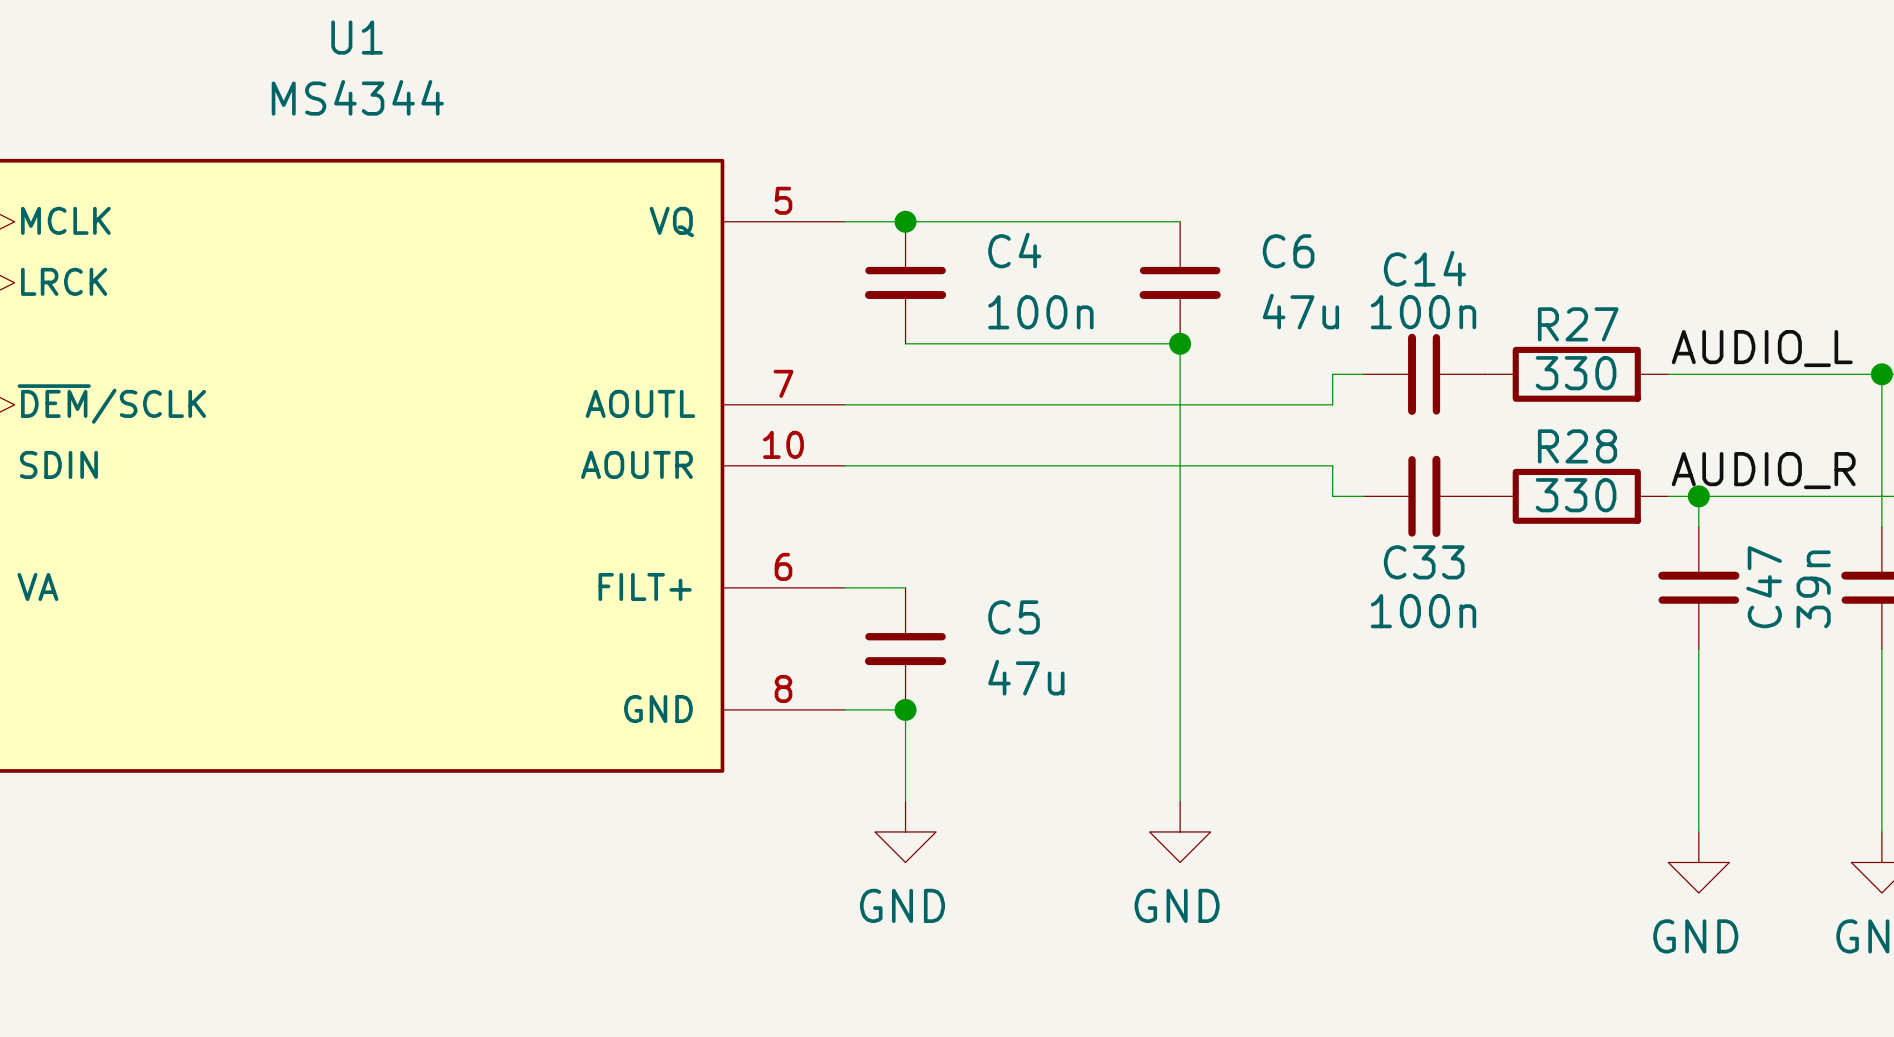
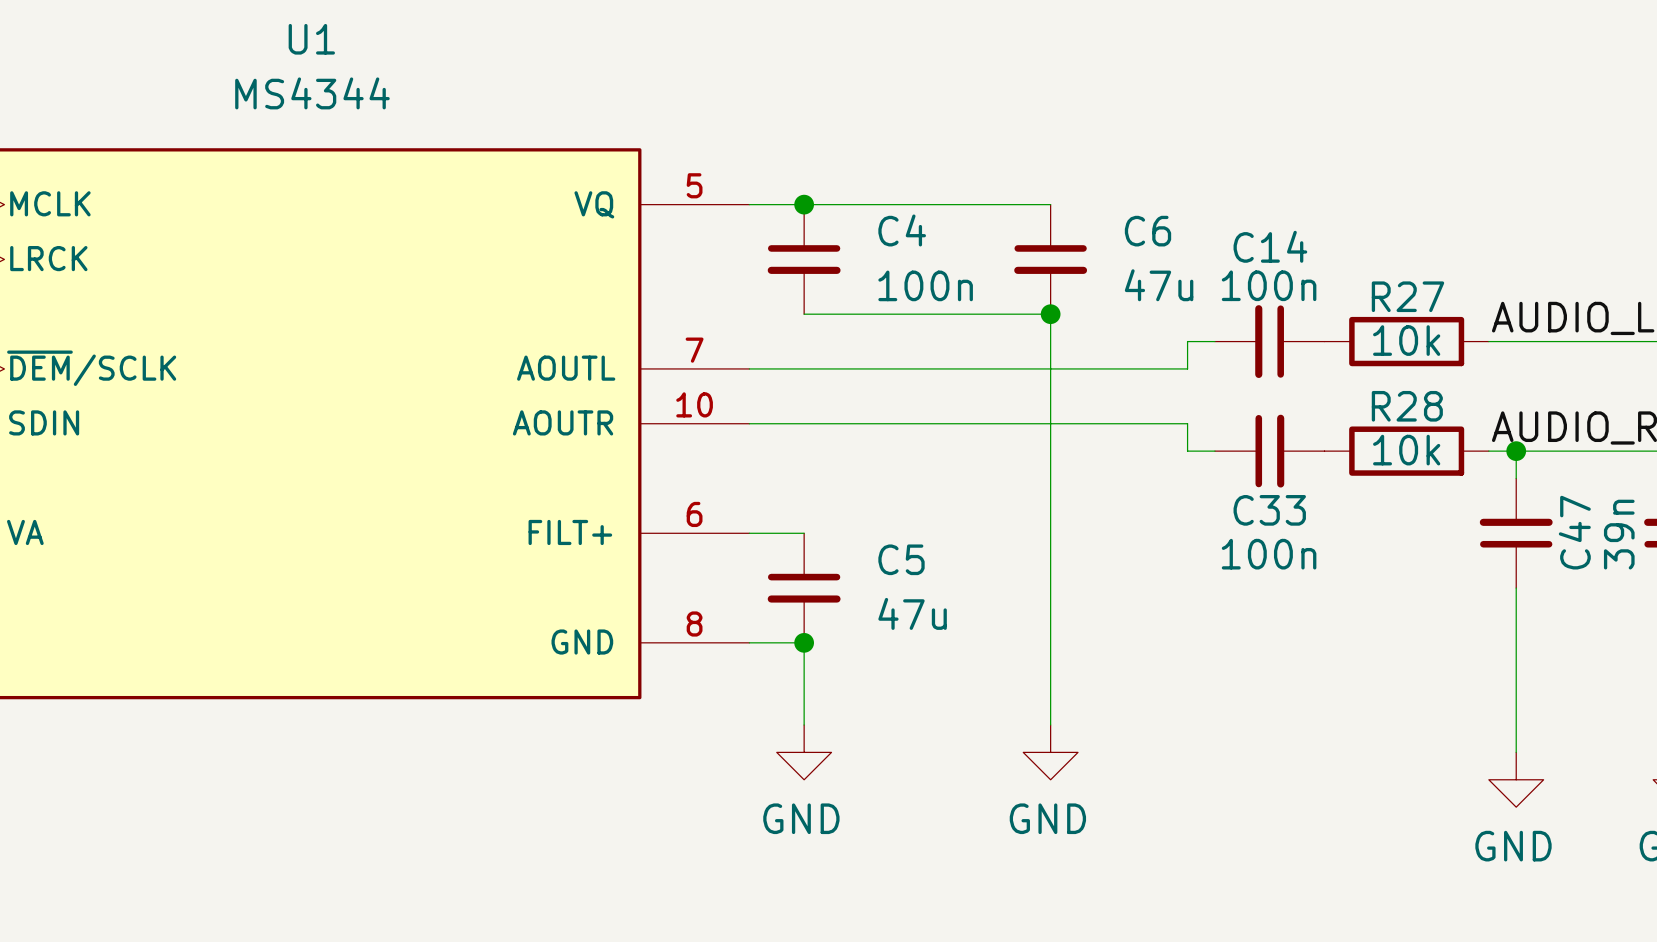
R27 value: 330 (1576, 373) -> 10k (1406, 340)
R28 value: 330 (1576, 495) -> 10k (1406, 450)

